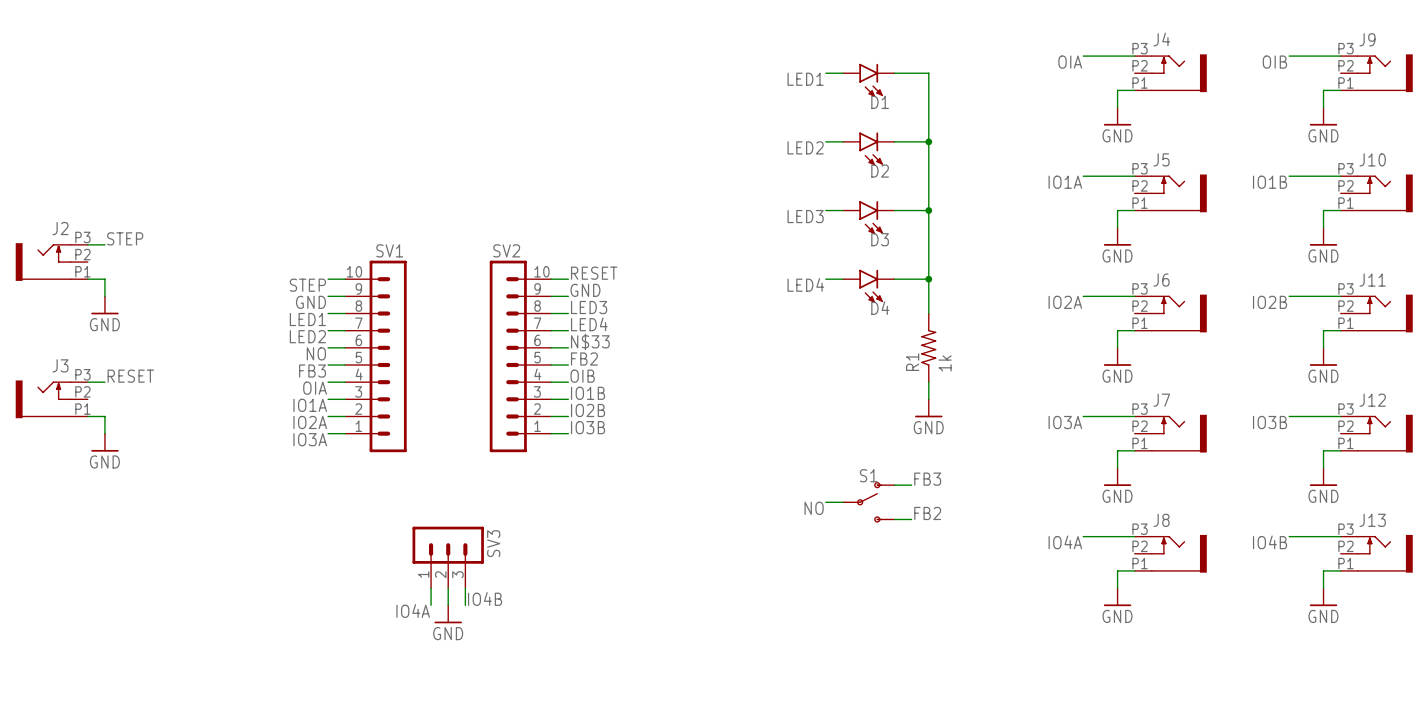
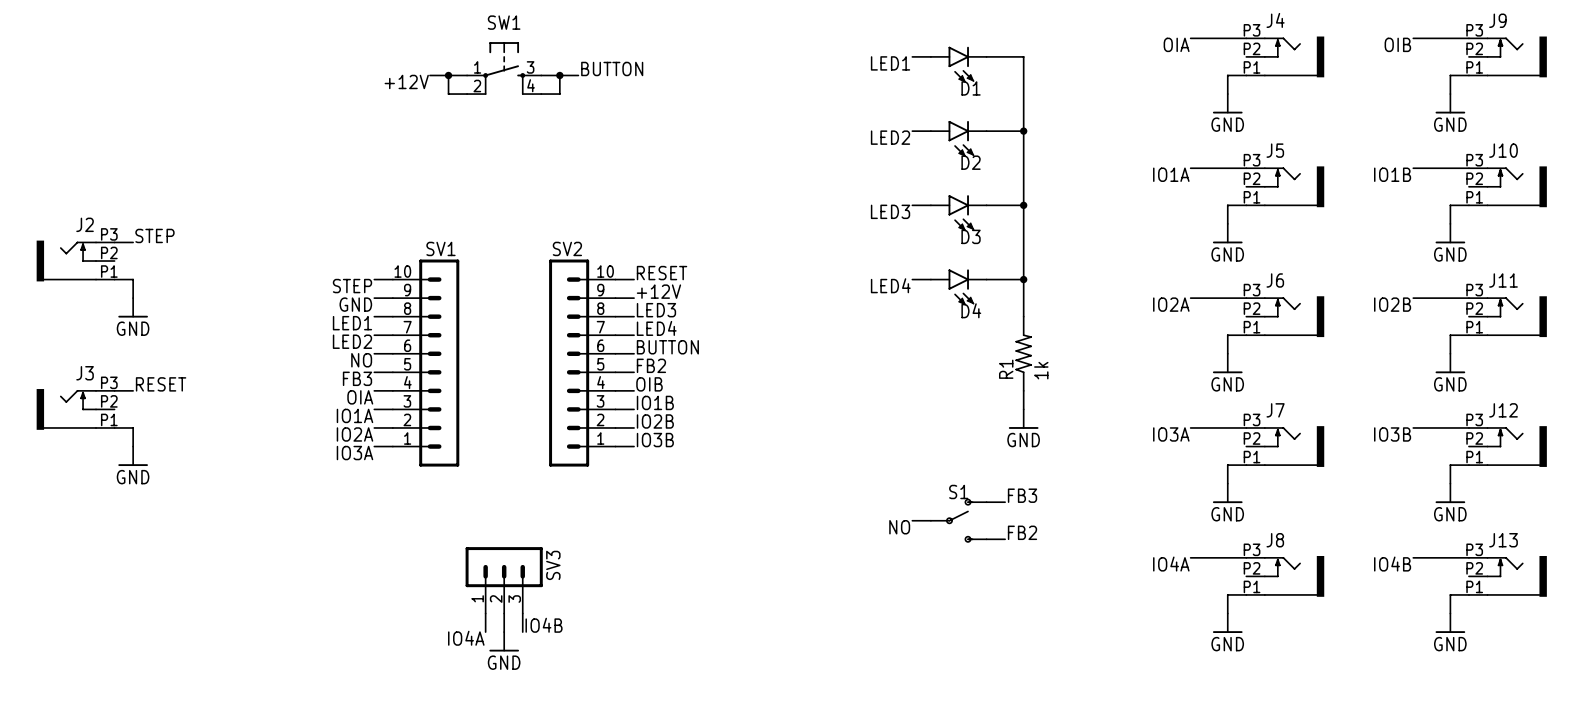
SW1: none -> (504, 68)
label: none -> BUTTON (612, 68)
wire: none -> (429, 75) (467, 75)
wire: none -> (448, 75) (448, 94) (467, 94)
junction: none -> (448, 75)
wire: none -> (541, 75) (578, 75)
wire: none -> (559, 75) (559, 94) (541, 94)
junction: none -> (559, 75)
label: none -> +12V (406, 81)
label: GND (585, 290) -> +12V (658, 291)
label: N$33 (590, 341) -> BUTTON (667, 347)

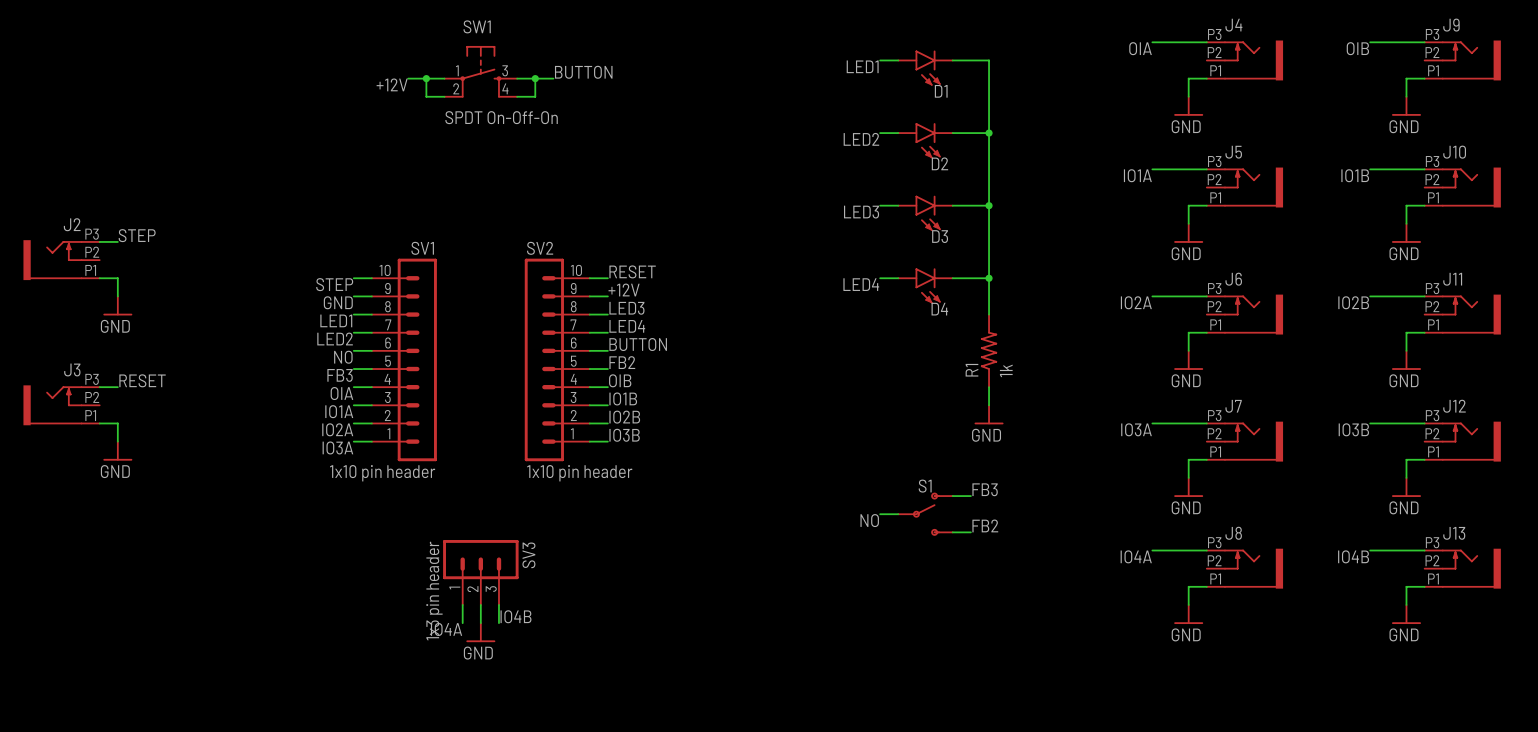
SW1 value: none -> SPDT On-Off-On (501, 117)
SV1 value: none -> 1x10 pin header (382, 473)
SV2 value: none -> 1x10 pin header (579, 473)
SV3 value: none -> 1x3 pin header (434, 591)

